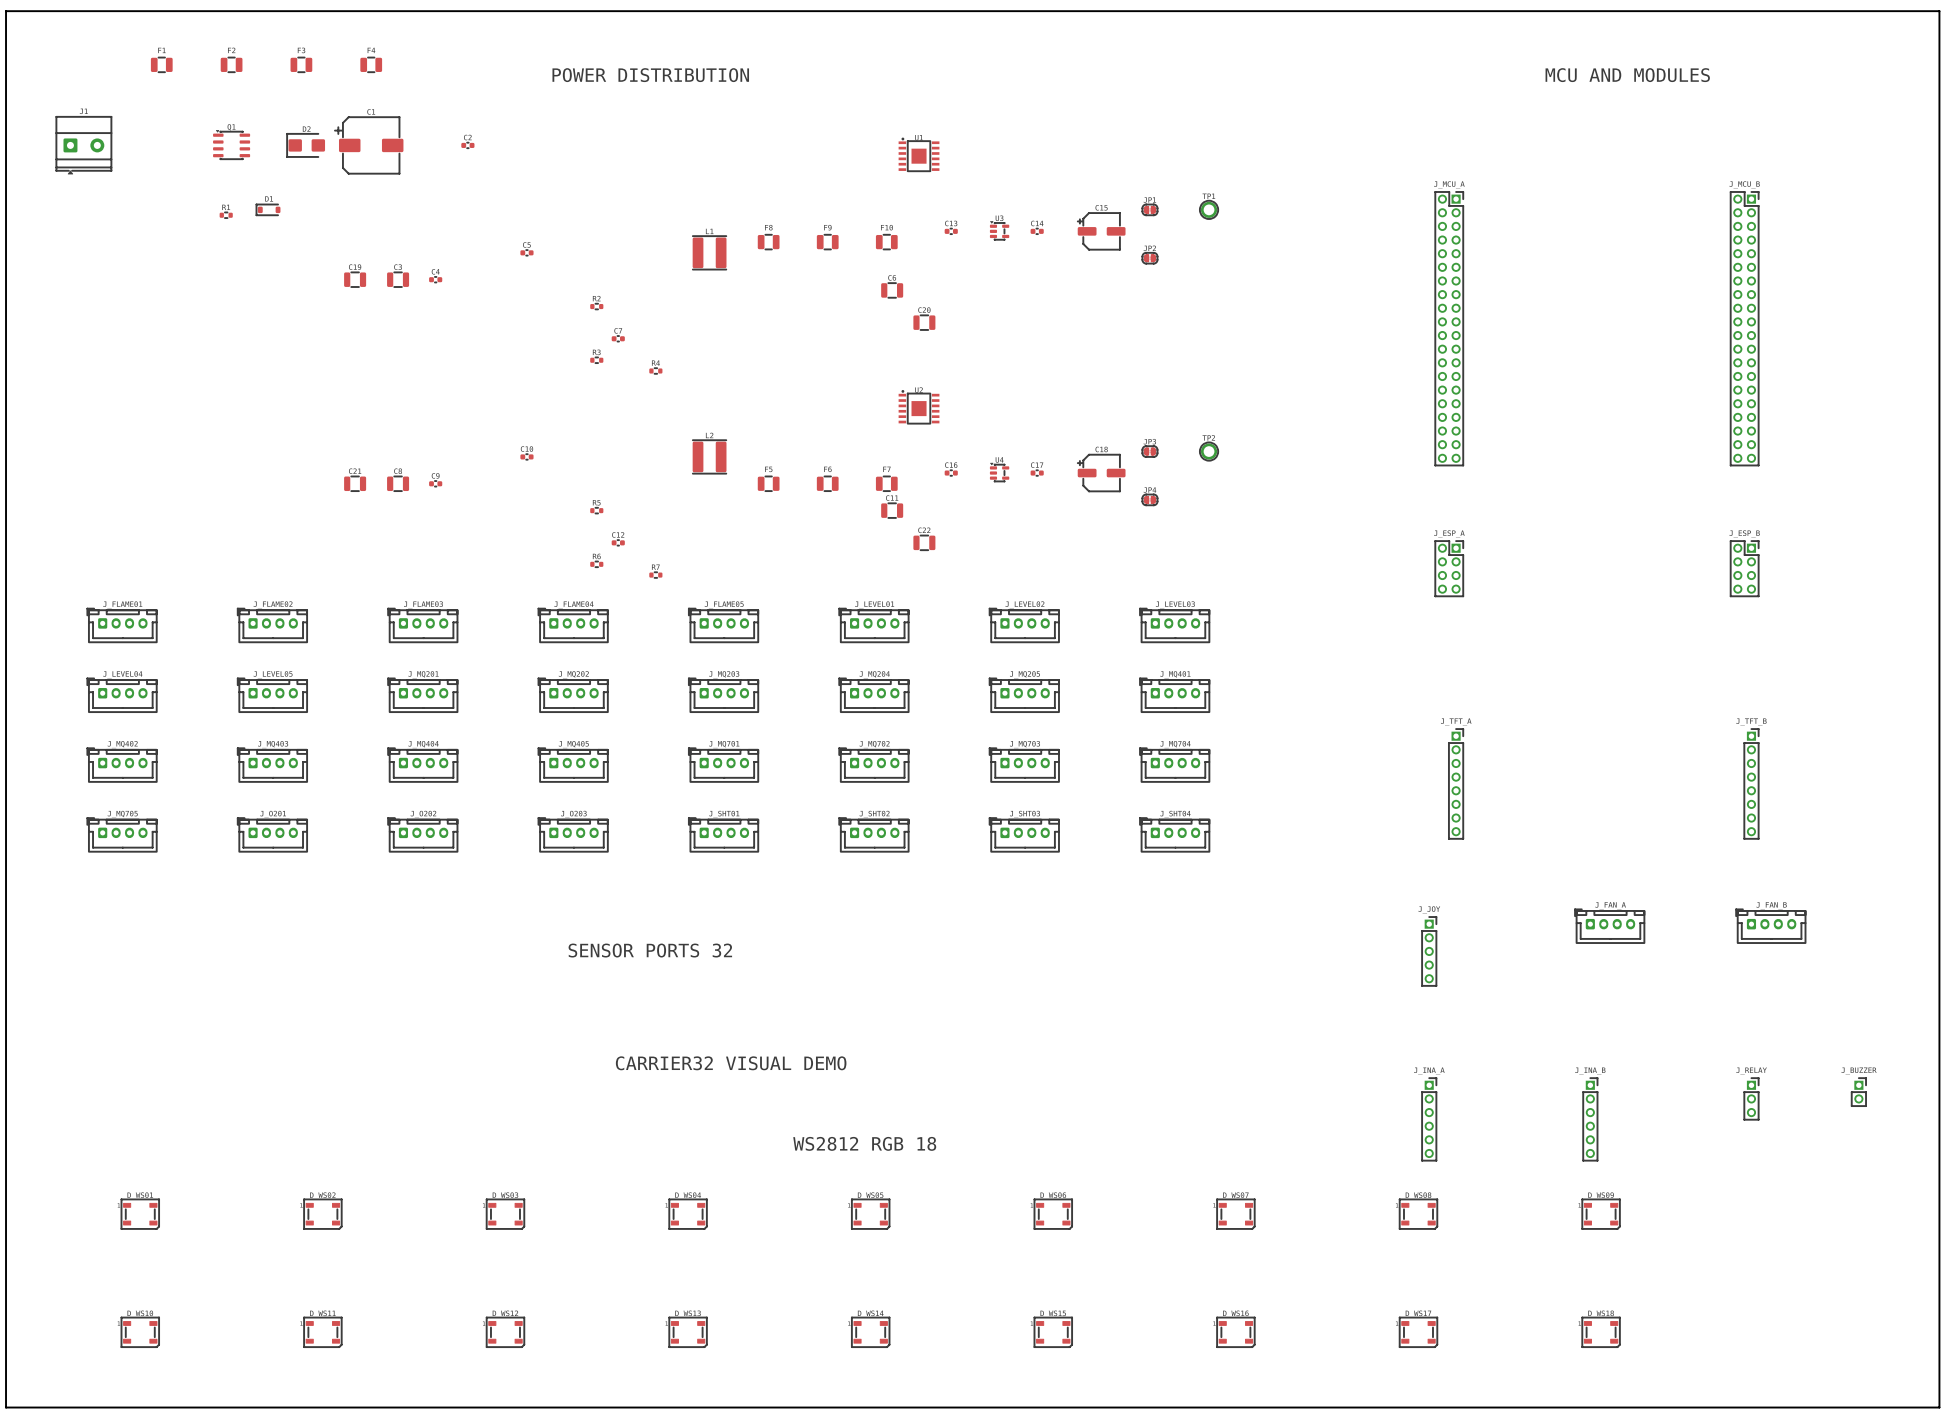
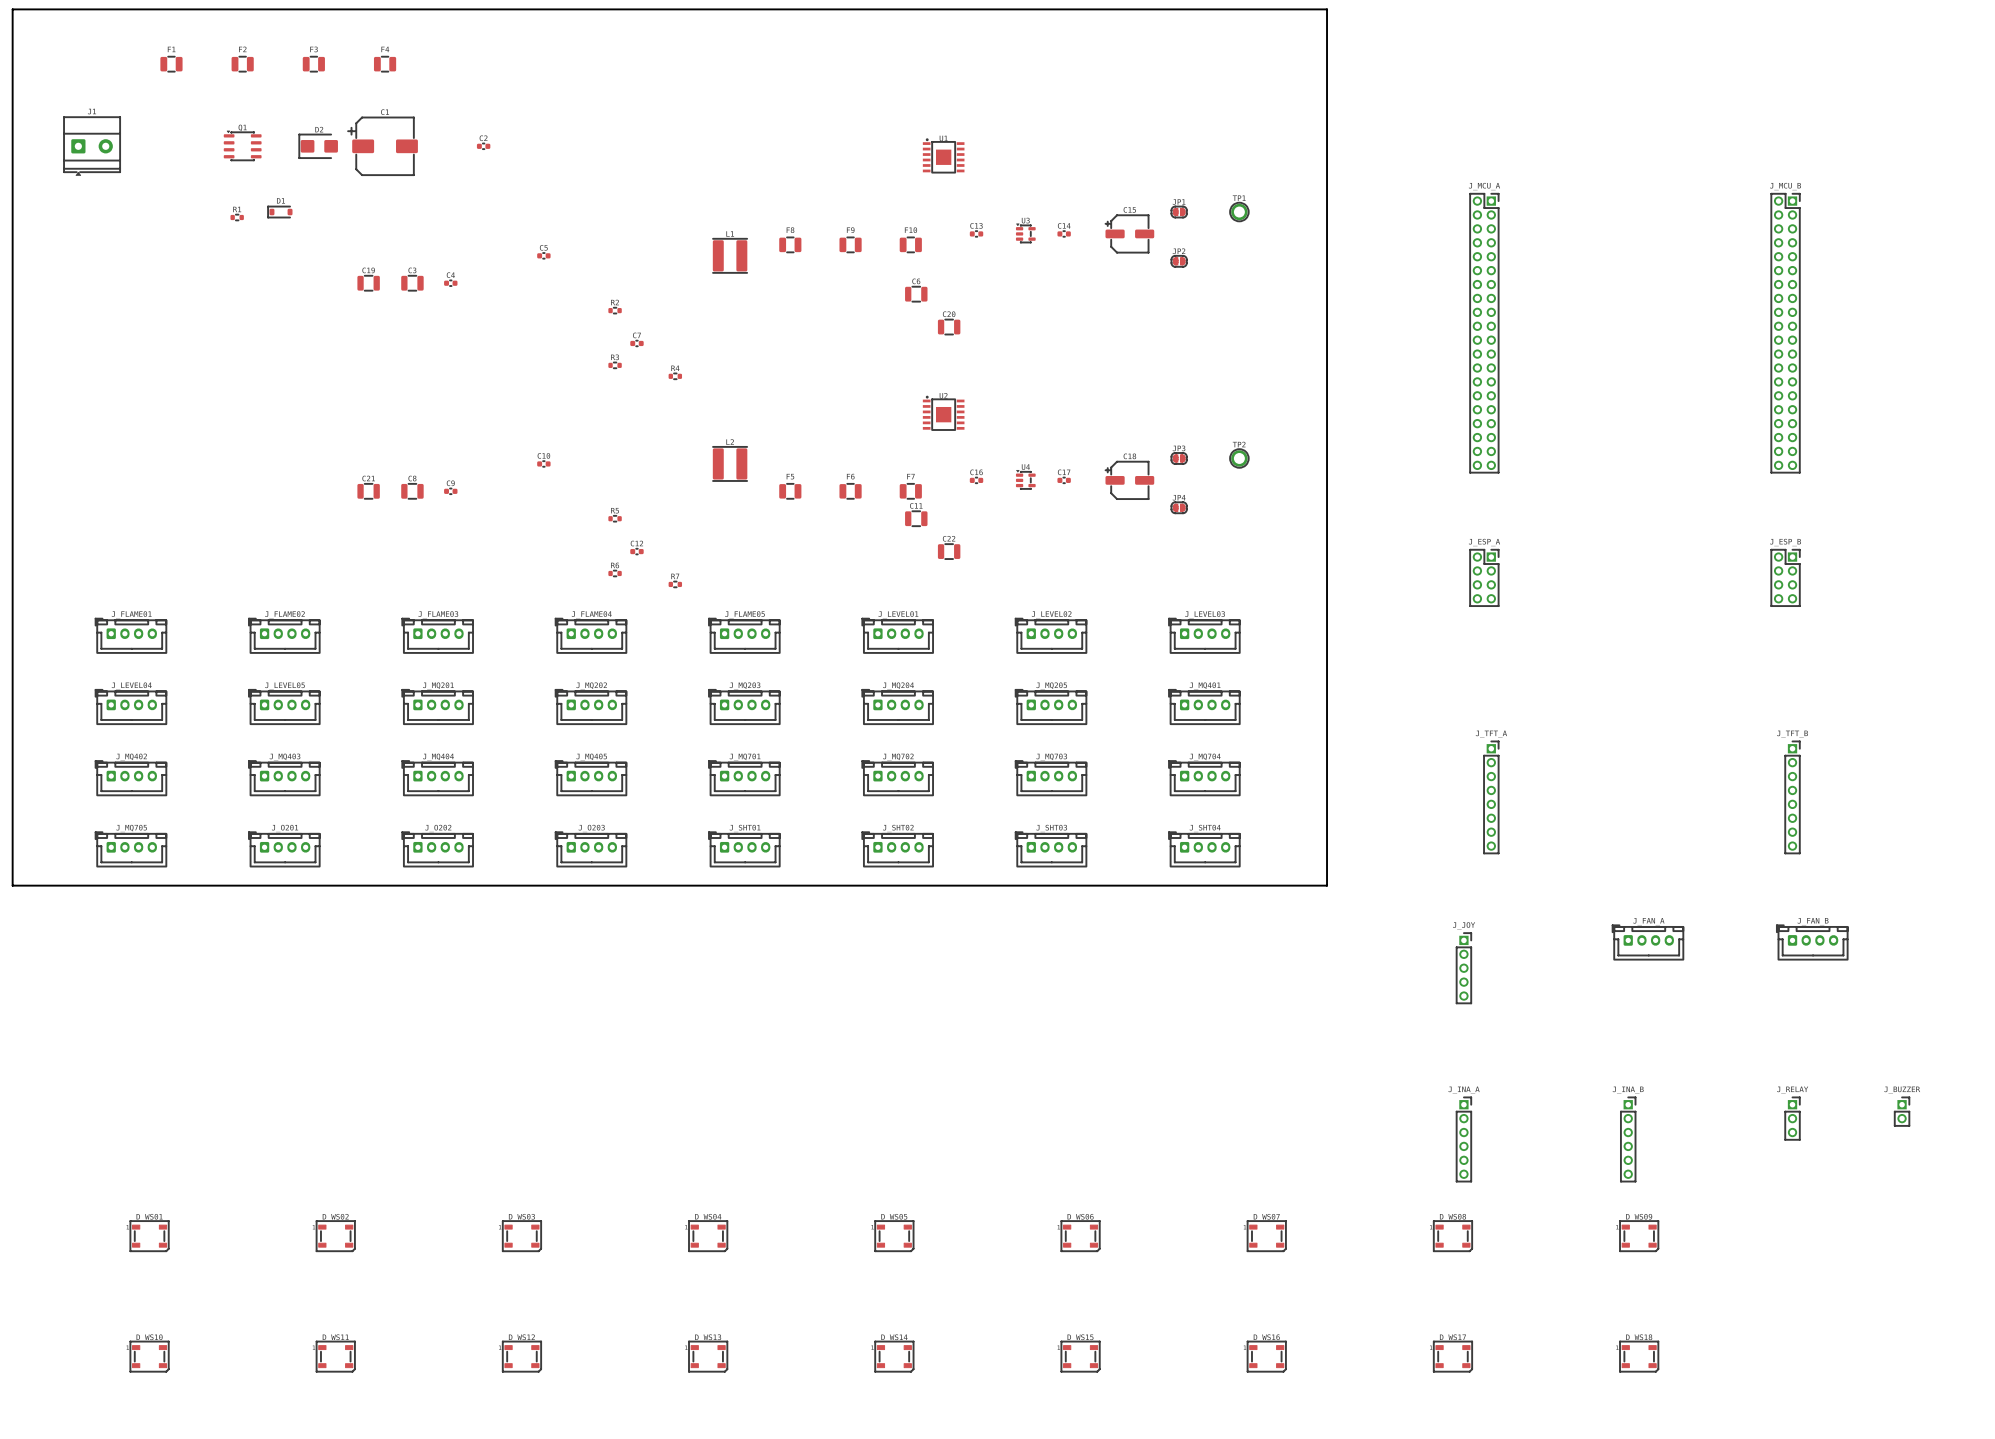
board edge: (1294, 11) (1939, 11) (1939, 1407) (6, 1407) (6, 870) -> (1327, 9) (1327, 885) (12, 885)
text: POWER DISTRIBUTION (650, 75) -> none
text: MCU AND MODULES (1627, 75) -> none
text: SENSOR PORTS 32 (650, 950) -> none
text: CARRIER32 VISUAL DEMO (731, 1063) -> none
text: WS2812 RGB 18 (864, 1143) -> none

